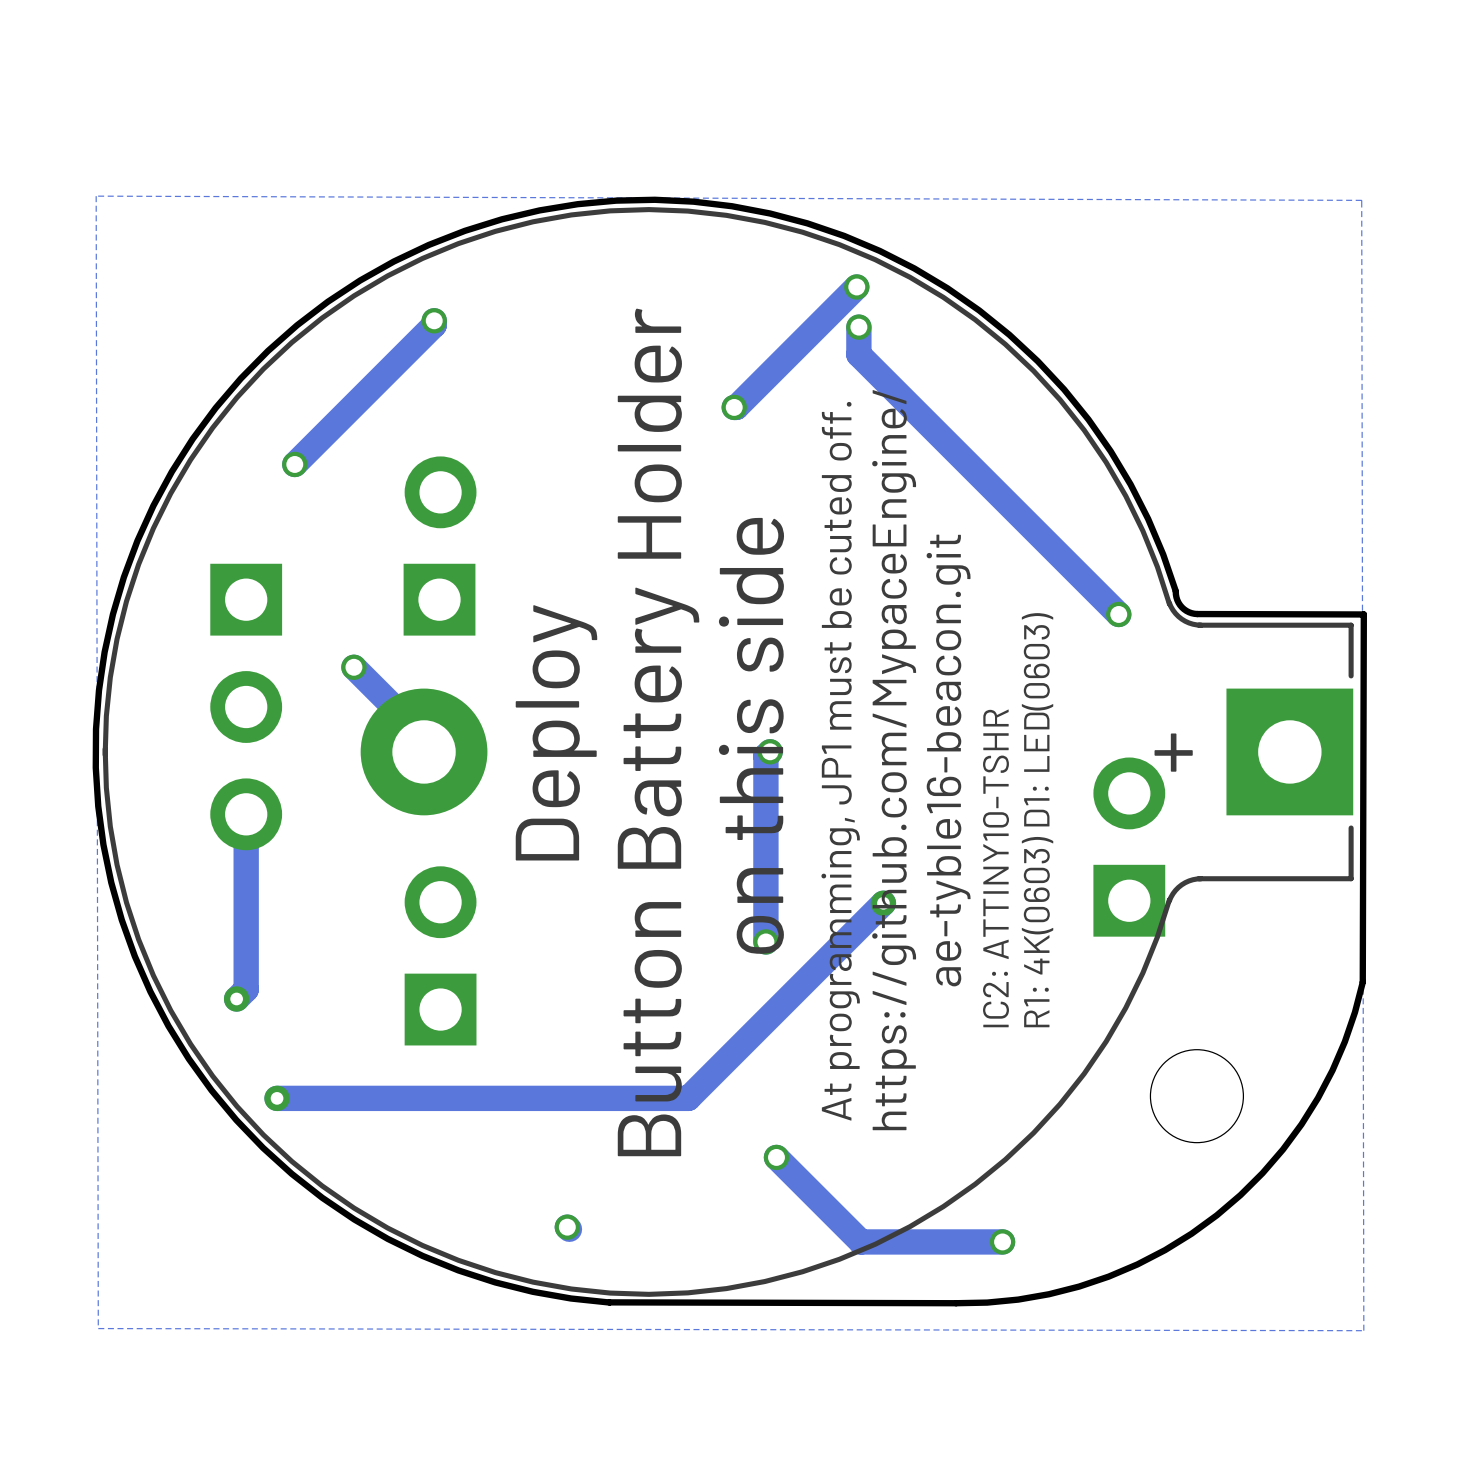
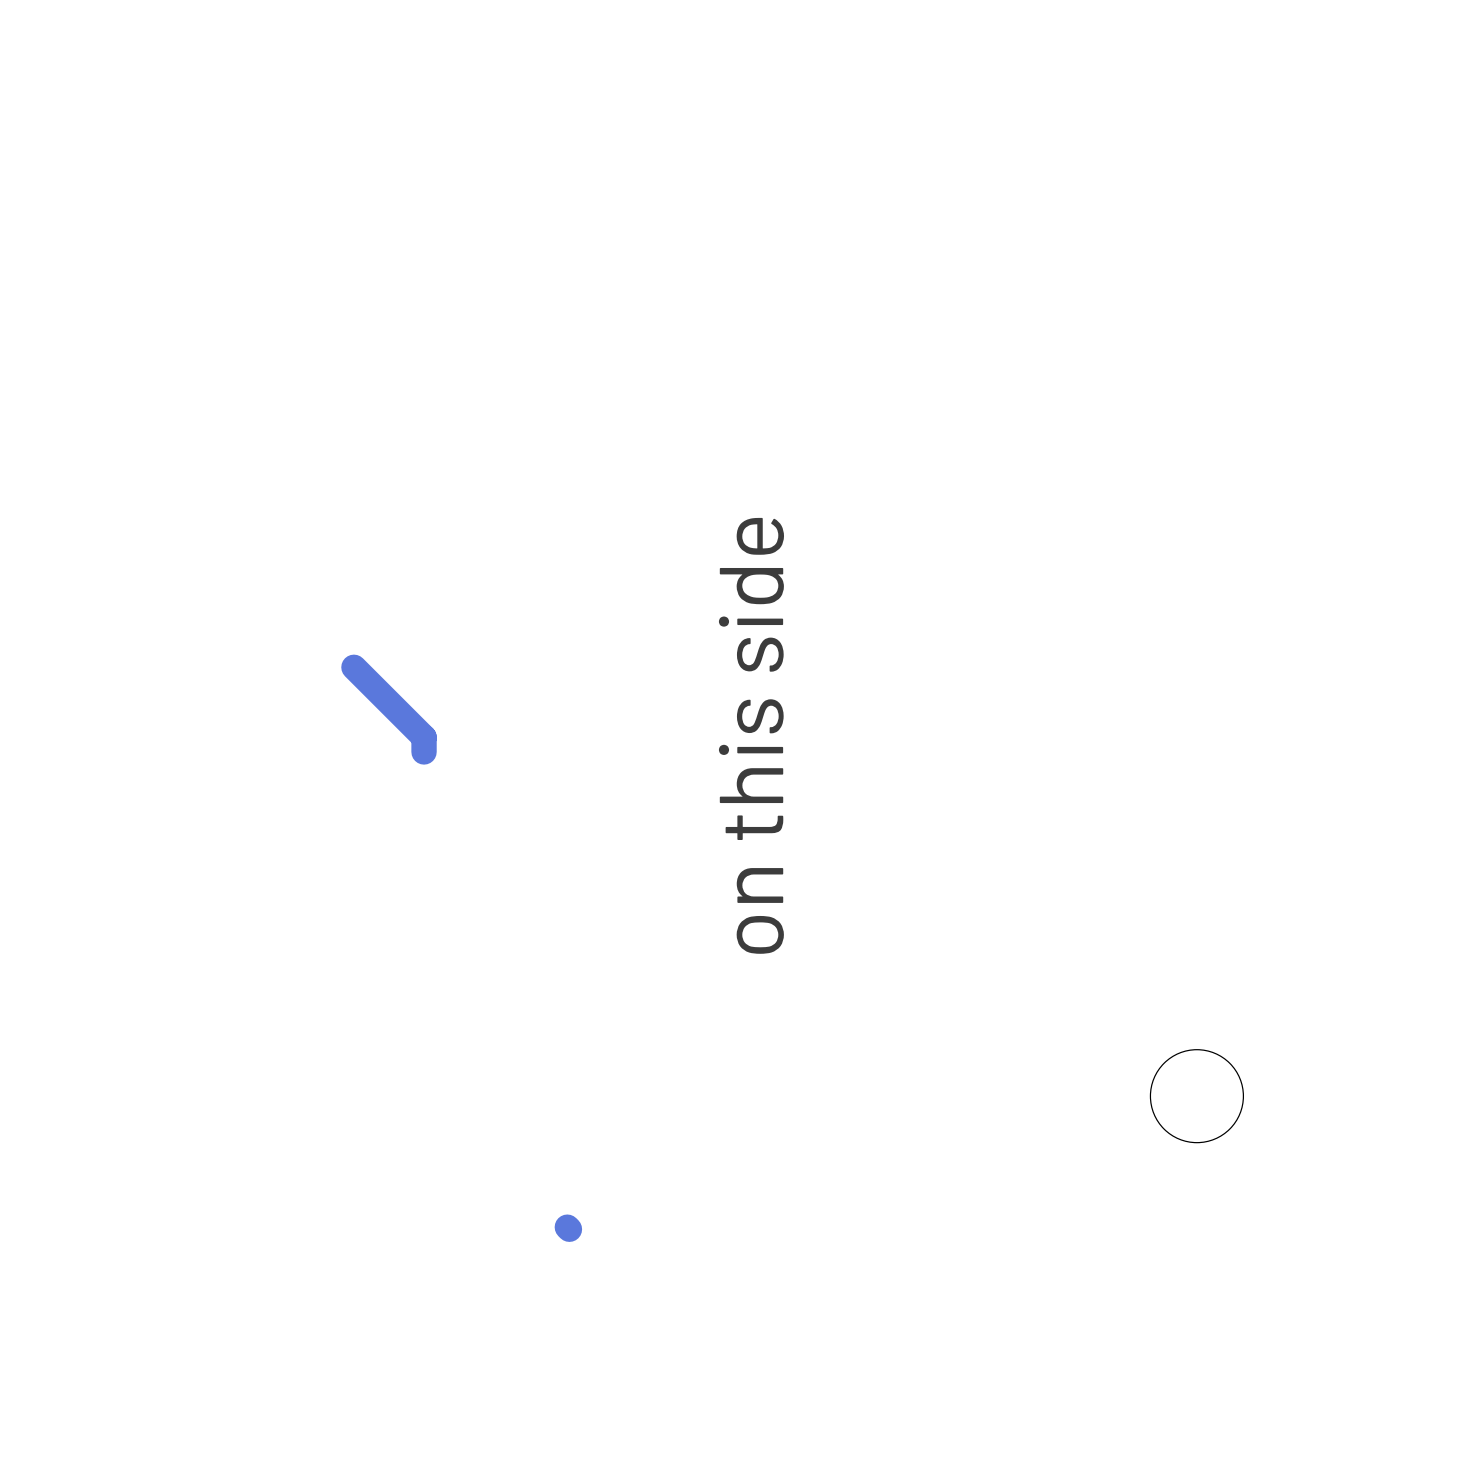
zone outline: (96, 196) (1361, 200) (1363, 1330) (98, 1328) (96, 196) -> none
track: (856, 286) (734, 407) -> none
via: (856, 286) -> none
track: (434, 320) (434, 325) (294, 464) -> none
via: (434, 320) -> none
track: (858, 327) (858, 354) (1118, 614) -> none
via: (858, 327) -> none
via: (734, 407) -> none
via: (294, 464) -> none
part: (440, 546) -> none
board edge: (1175, 591) (1148, 518) (1130, 484) (1110, 451) (1064, 389) (1037, 361) (979, 310) (914, 268) (879, 250) (807, 223) (732, 206) (693, 201) (616, 200) (577, 204) (501, 219) (428, 244) (393, 261) (327, 301) (297, 325) (240, 378) (215, 407) (171, 471) (137, 540) (123, 577) (112, 614) (98, 690) (96, 729) (98, 806) (111, 882) (121, 919) (150, 991) (188, 1058) (236, 1120) (291, 1173) (354, 1219) (422, 1255) (458, 1270) (532, 1291) (609, 1302) (987, 1302) (1018, 1299) (1079, 1286) (1137, 1264) (1165, 1250) (1216, 1215) (1262, 1173) (1283, 1149) (1301, 1124) (1332, 1070) (1344, 1041) (1362, 982) -> none
board edge: (1175, 591) (1177, 600) (1181, 607) (1194, 613) (1363, 614) (1362, 982) -> none
via: (1118, 614) -> none
via: (353, 667) -> none
part: (246, 707) -> none
text: Deploy (556, 732) -> none
text: Button Battery Holder (658, 732) -> none
part: (728, 751) -> none
track: (770, 751) (765, 756) (765, 941) -> none
via: (770, 751) -> none
text: https://github.com/MypaceEngine/ (894, 760) -> none
text: ae-tyble16-beacon.git (948, 760) -> none
text: At programming, JP1 must be cuted off. (840, 761) -> none
track: (246, 814) (246, 989) (236, 998) -> none
text: R1: 4K(0603) D1: LED(0603) (1037, 820) -> none
part: (1129, 847) -> none
text: IC2: ATTINY10-TSHR (996, 868) -> none
track: (883, 903) (688, 1098) (277, 1098) -> none
via: (883, 903) -> none
via: (765, 941) -> none
part: (440, 955) -> none
via: (236, 998) -> none
via: (277, 1098) -> none
track: (776, 1157) (860, 1241) (1002, 1241) -> none
via: (776, 1157) -> none
via: (567, 1227) -> none
via: (1002, 1241) -> none

